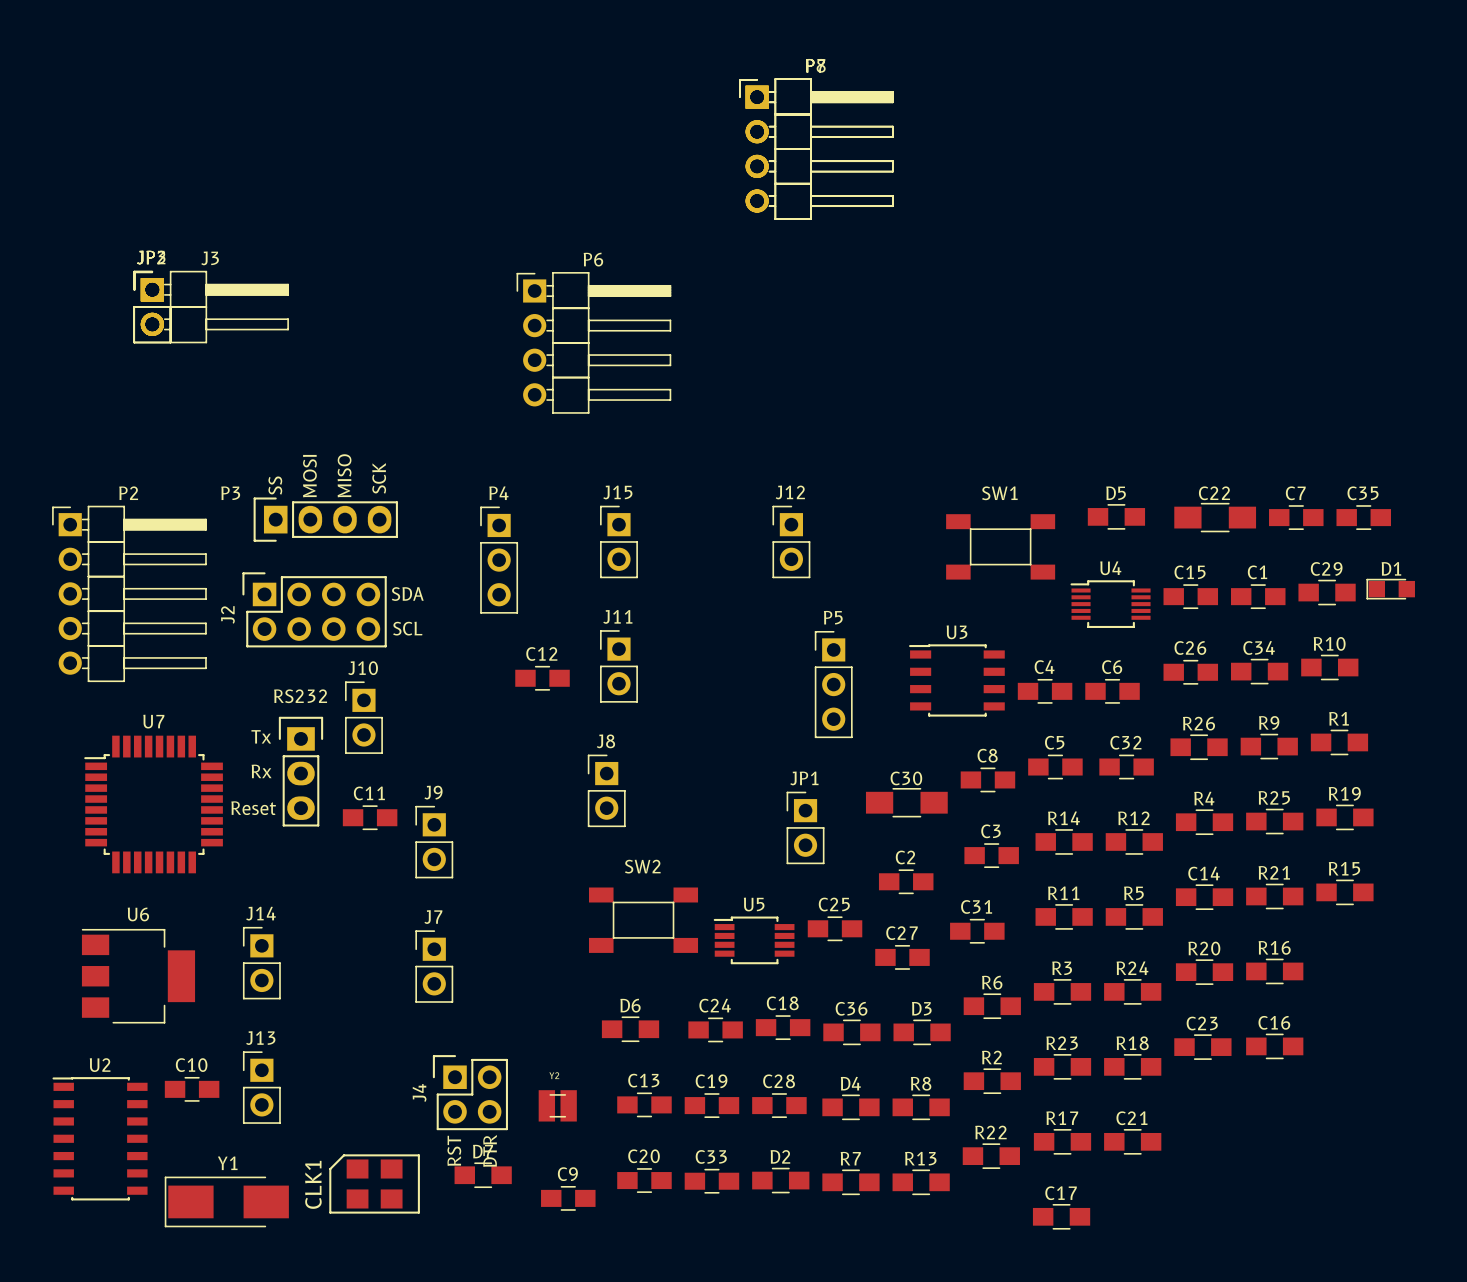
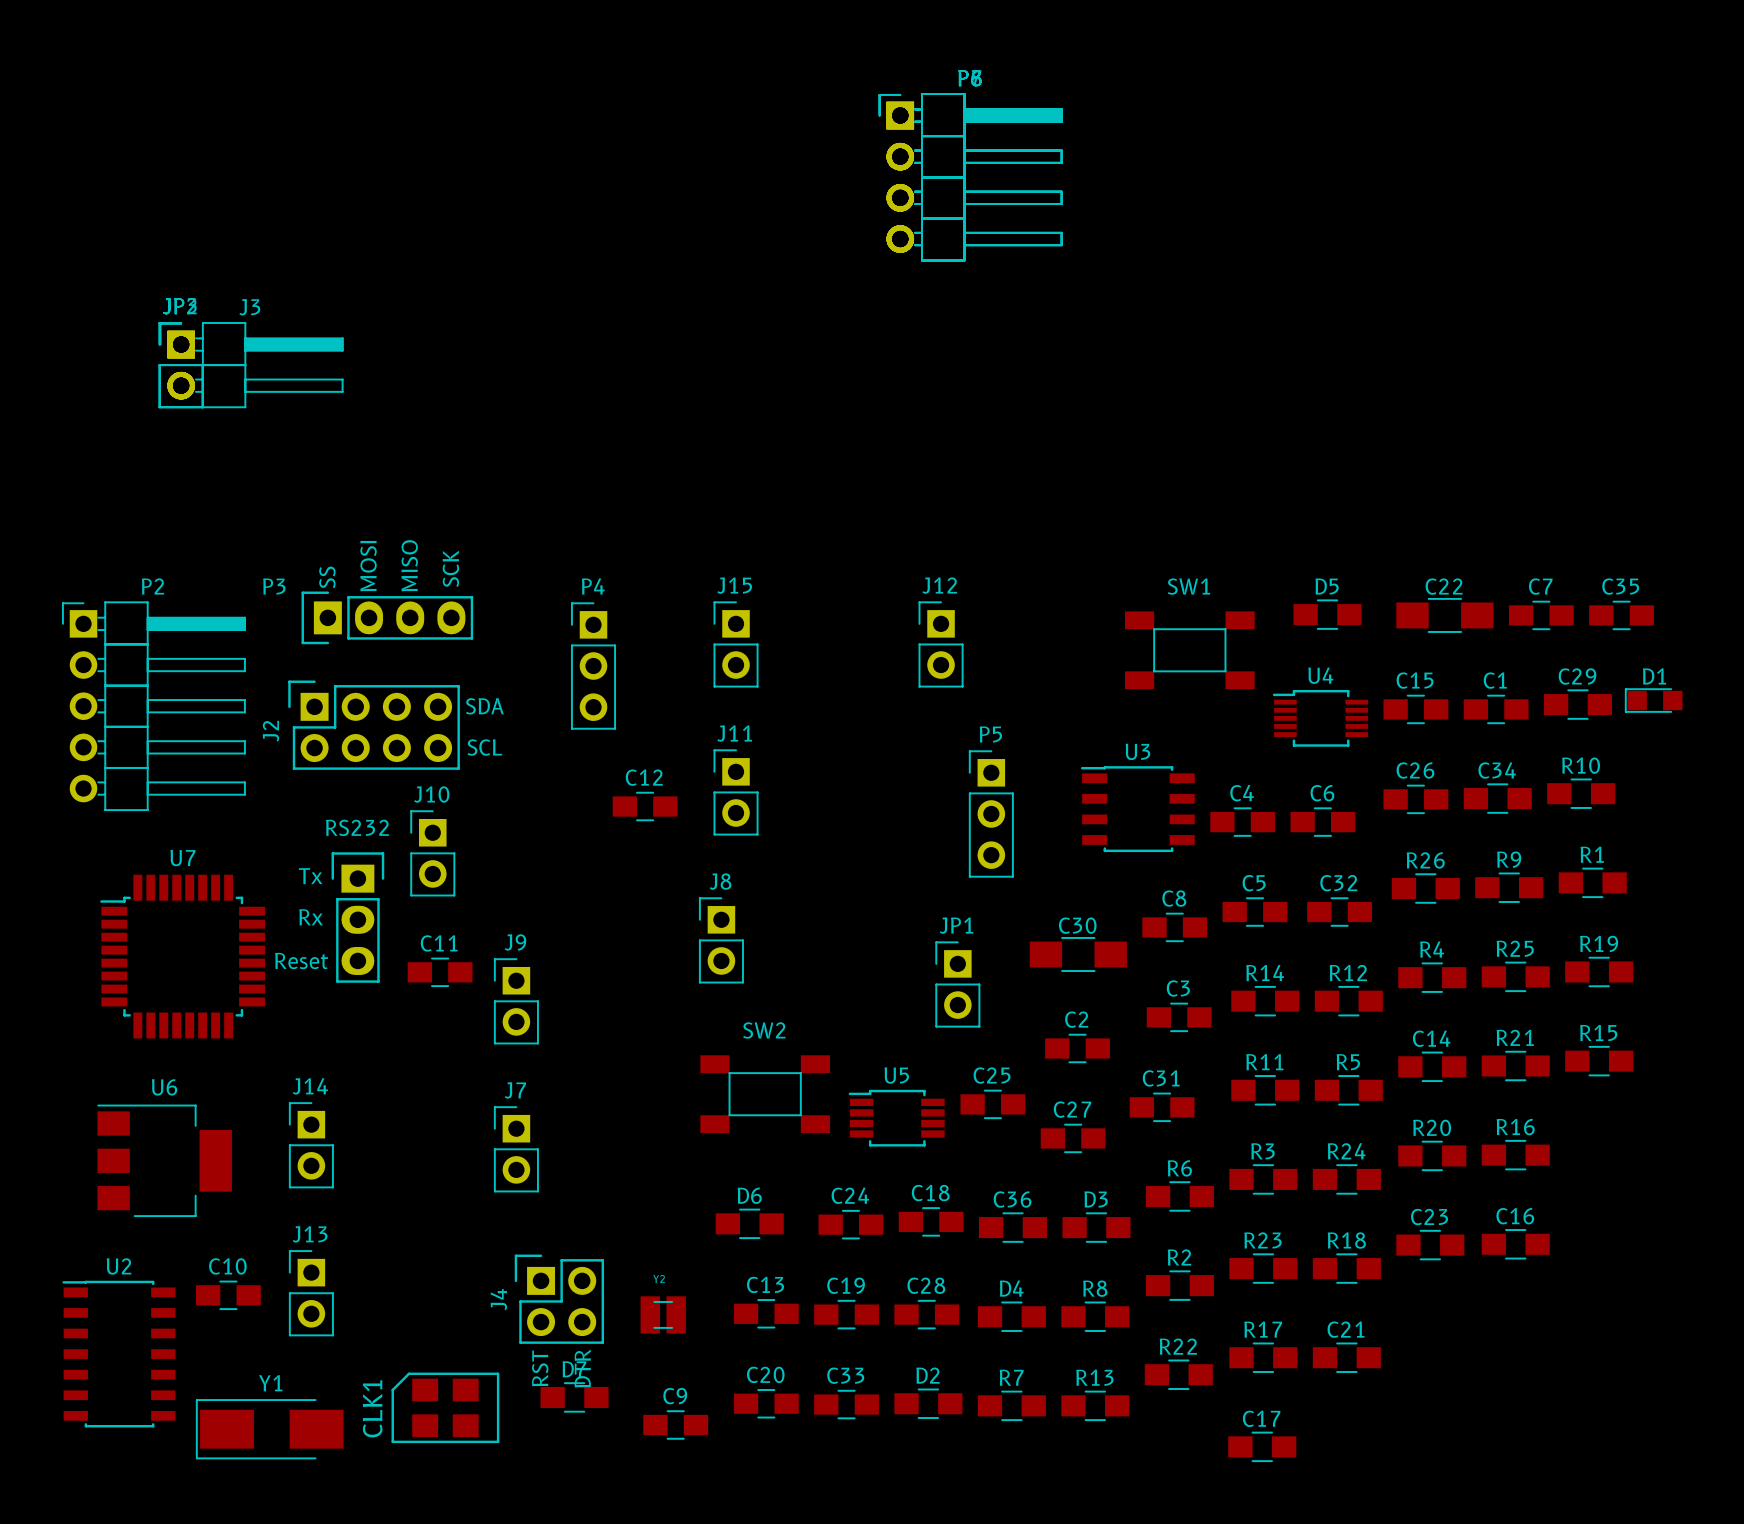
P6 position: (593, 342) -> (970, 177)

